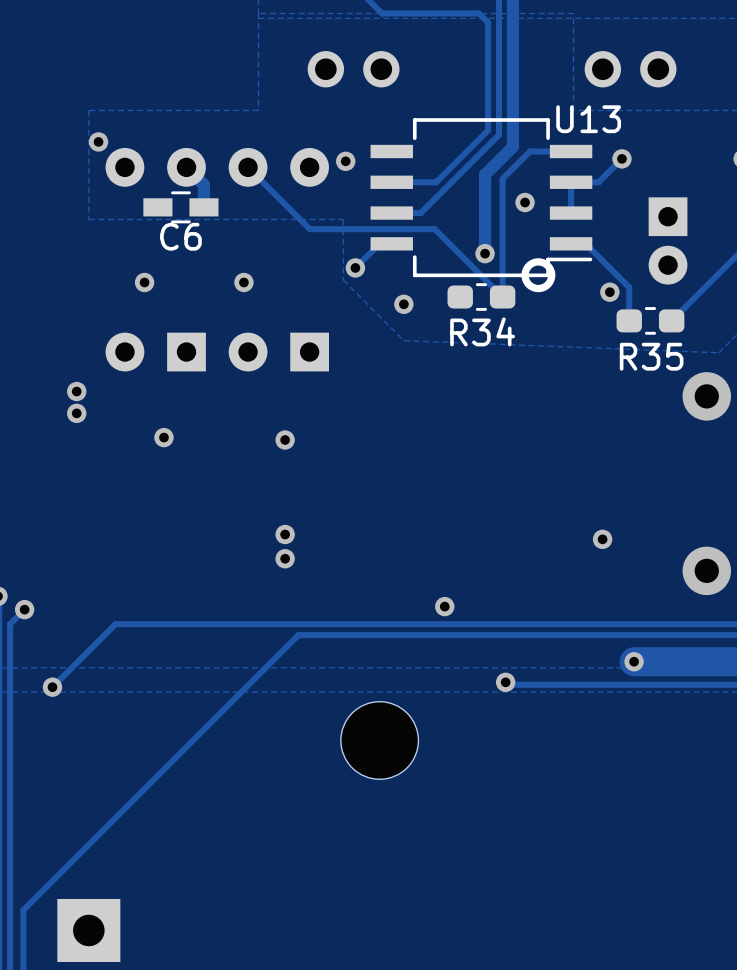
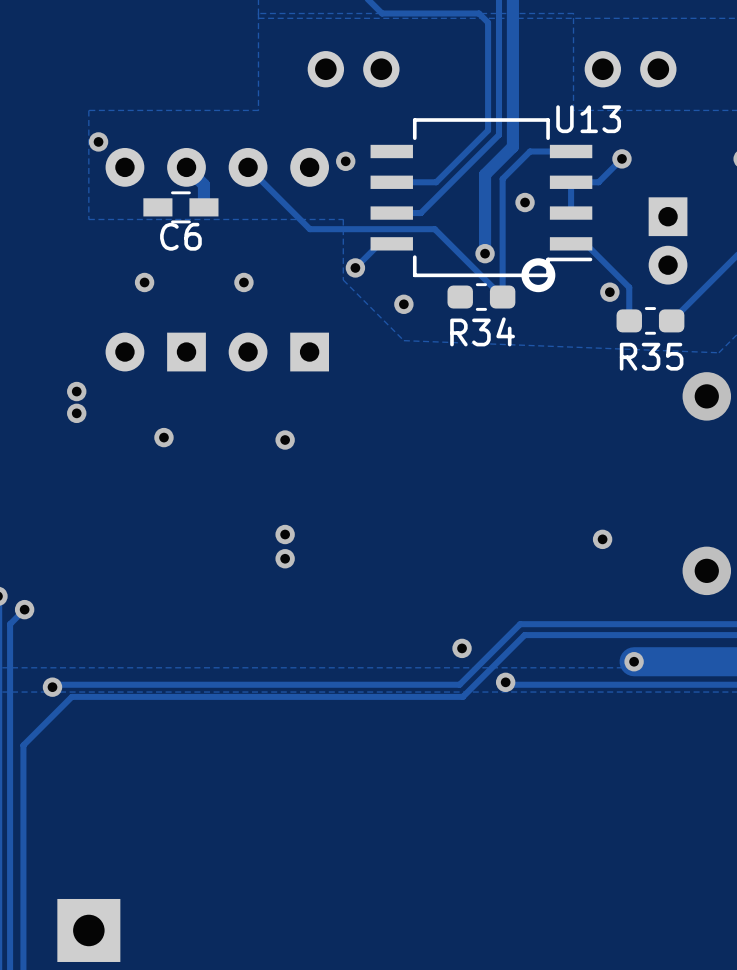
via position: (444, 606) -> (462, 648)
track: (520, 624) (115, 624) (54, 684) -> (520, 624) (459, 684) (54, 684)
track: (524, 635) (298, 635) (23, 910) -> (524, 635) (462, 696) (71, 696) (23, 745) (23, 910)
part: (379, 740) -> none

